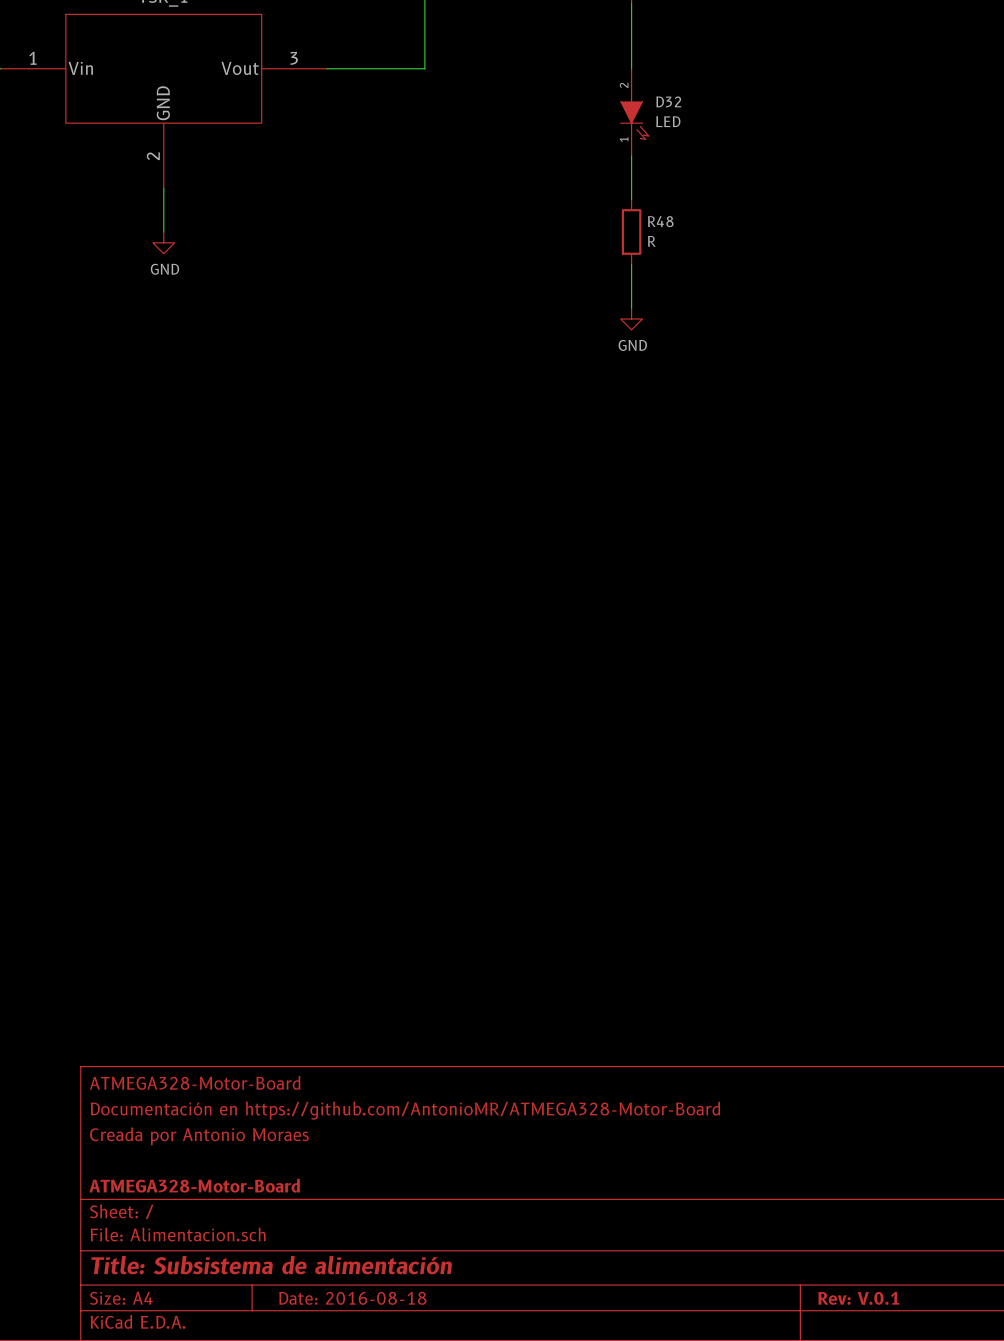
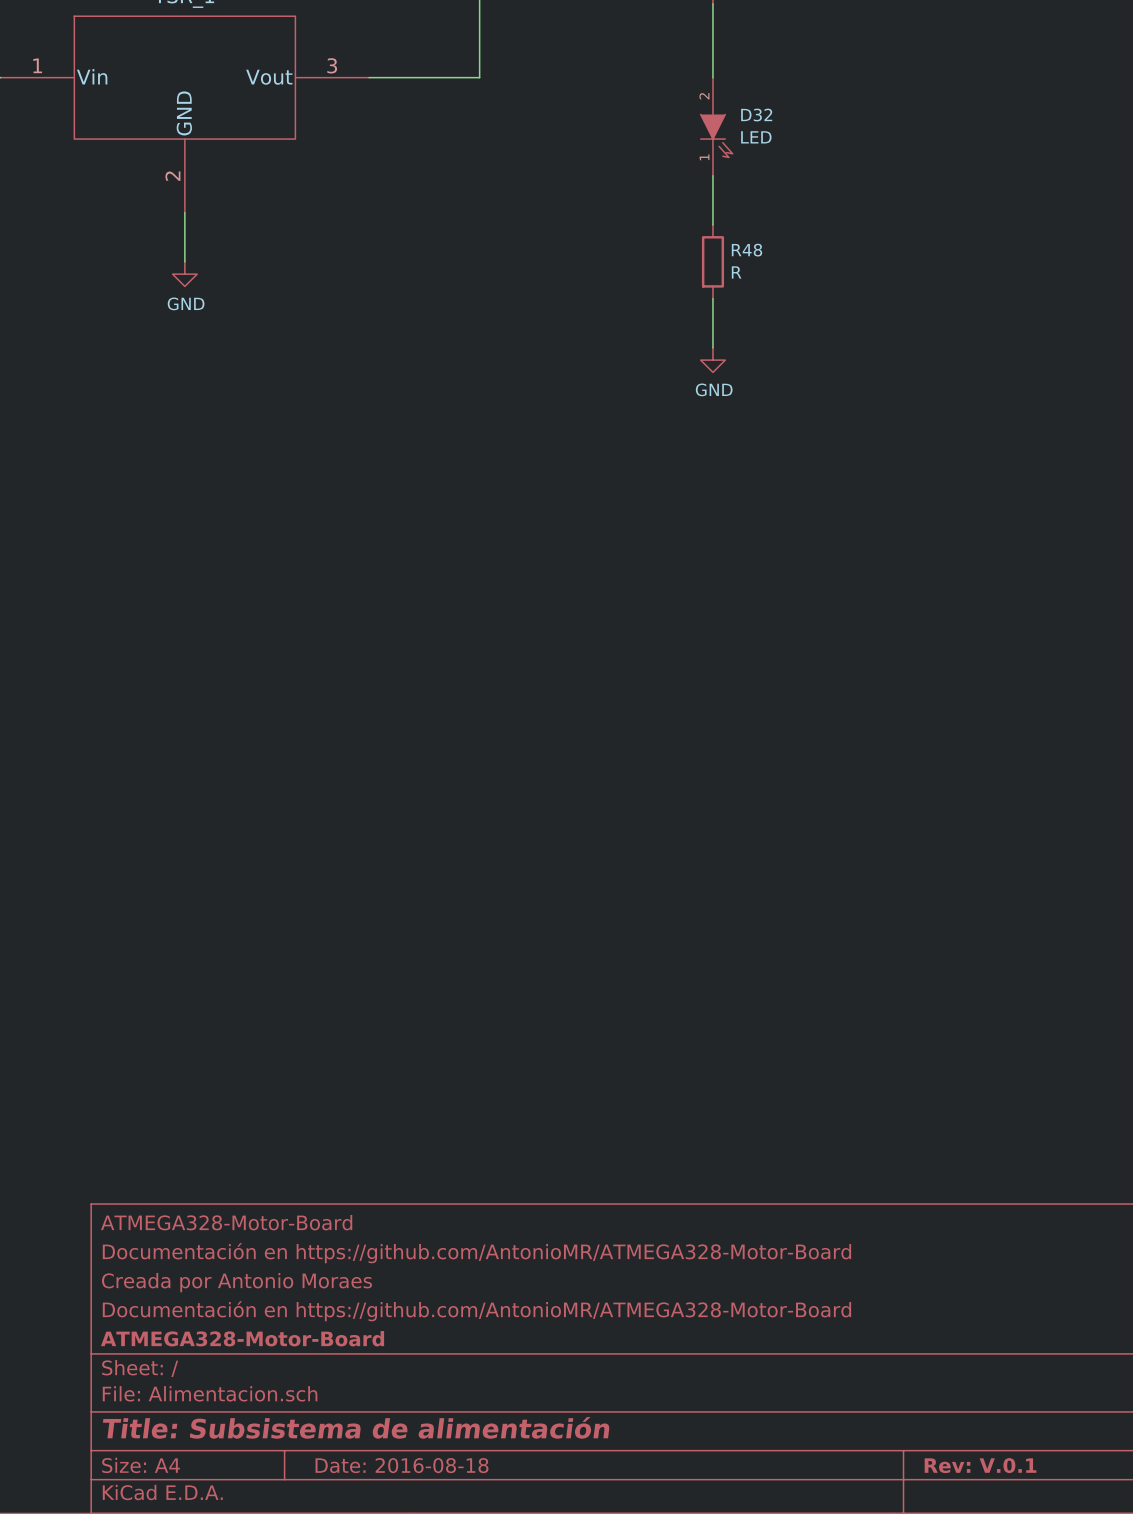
title block: none -> Documentación en https://github.com/AntonioMR/ATMEGA328-Motor-Board (476, 1311)

